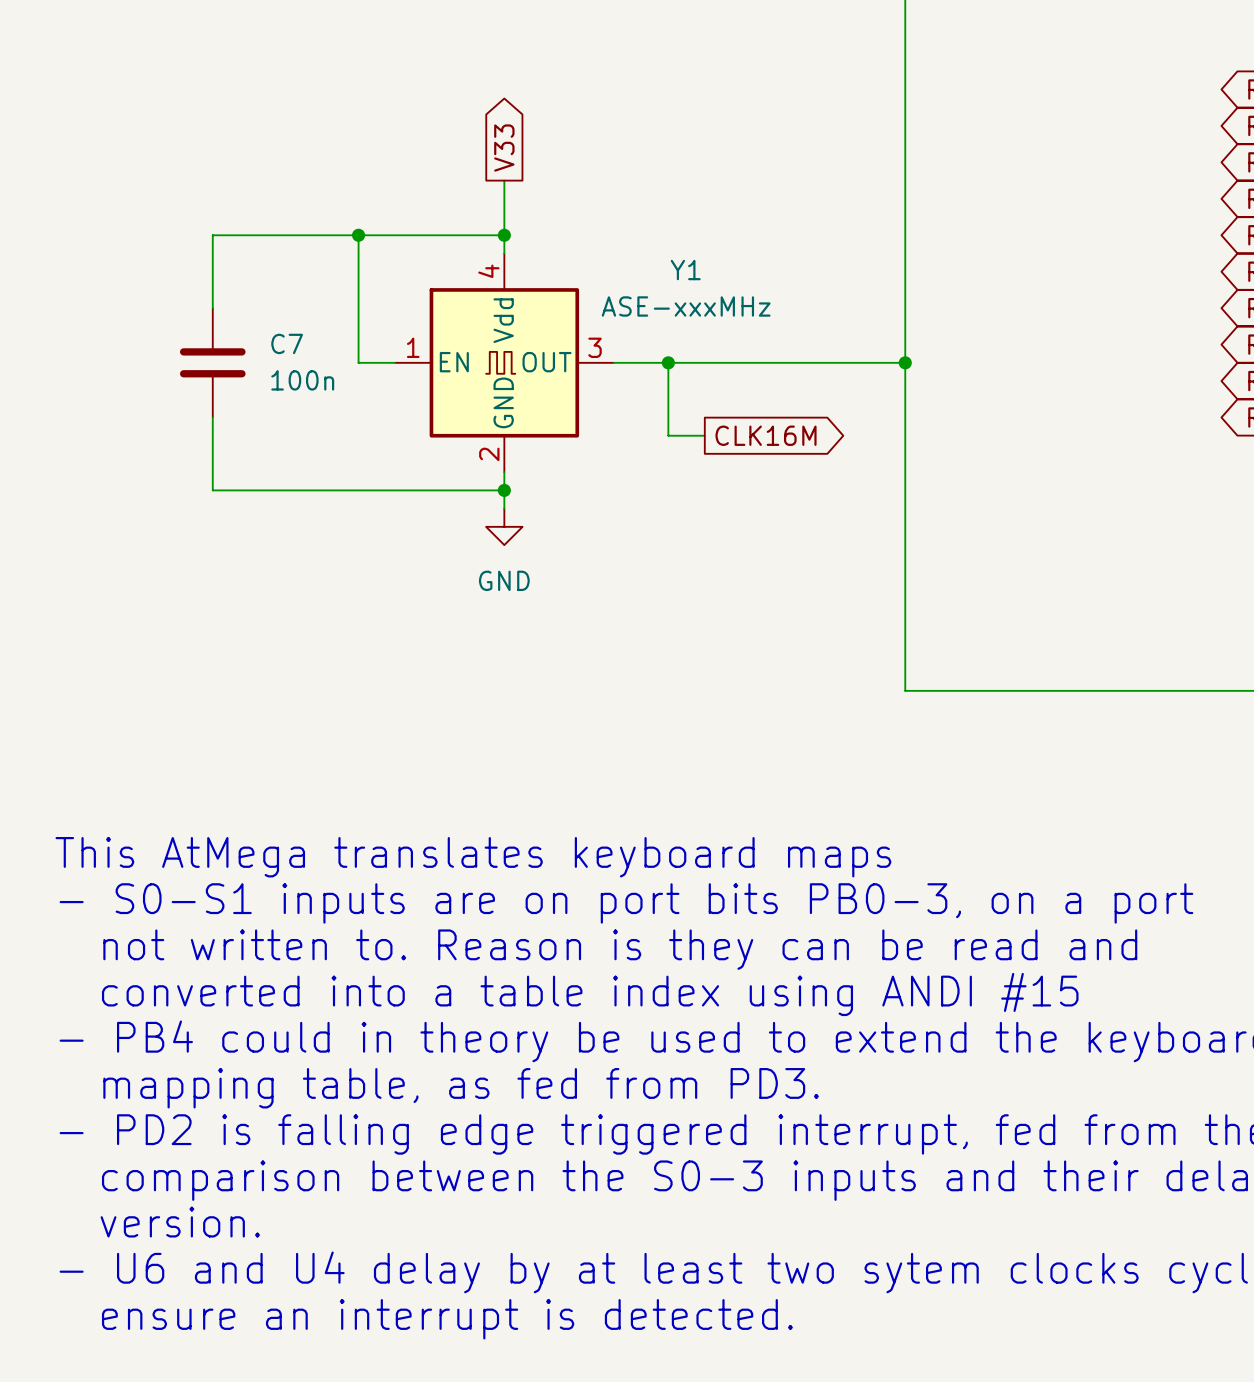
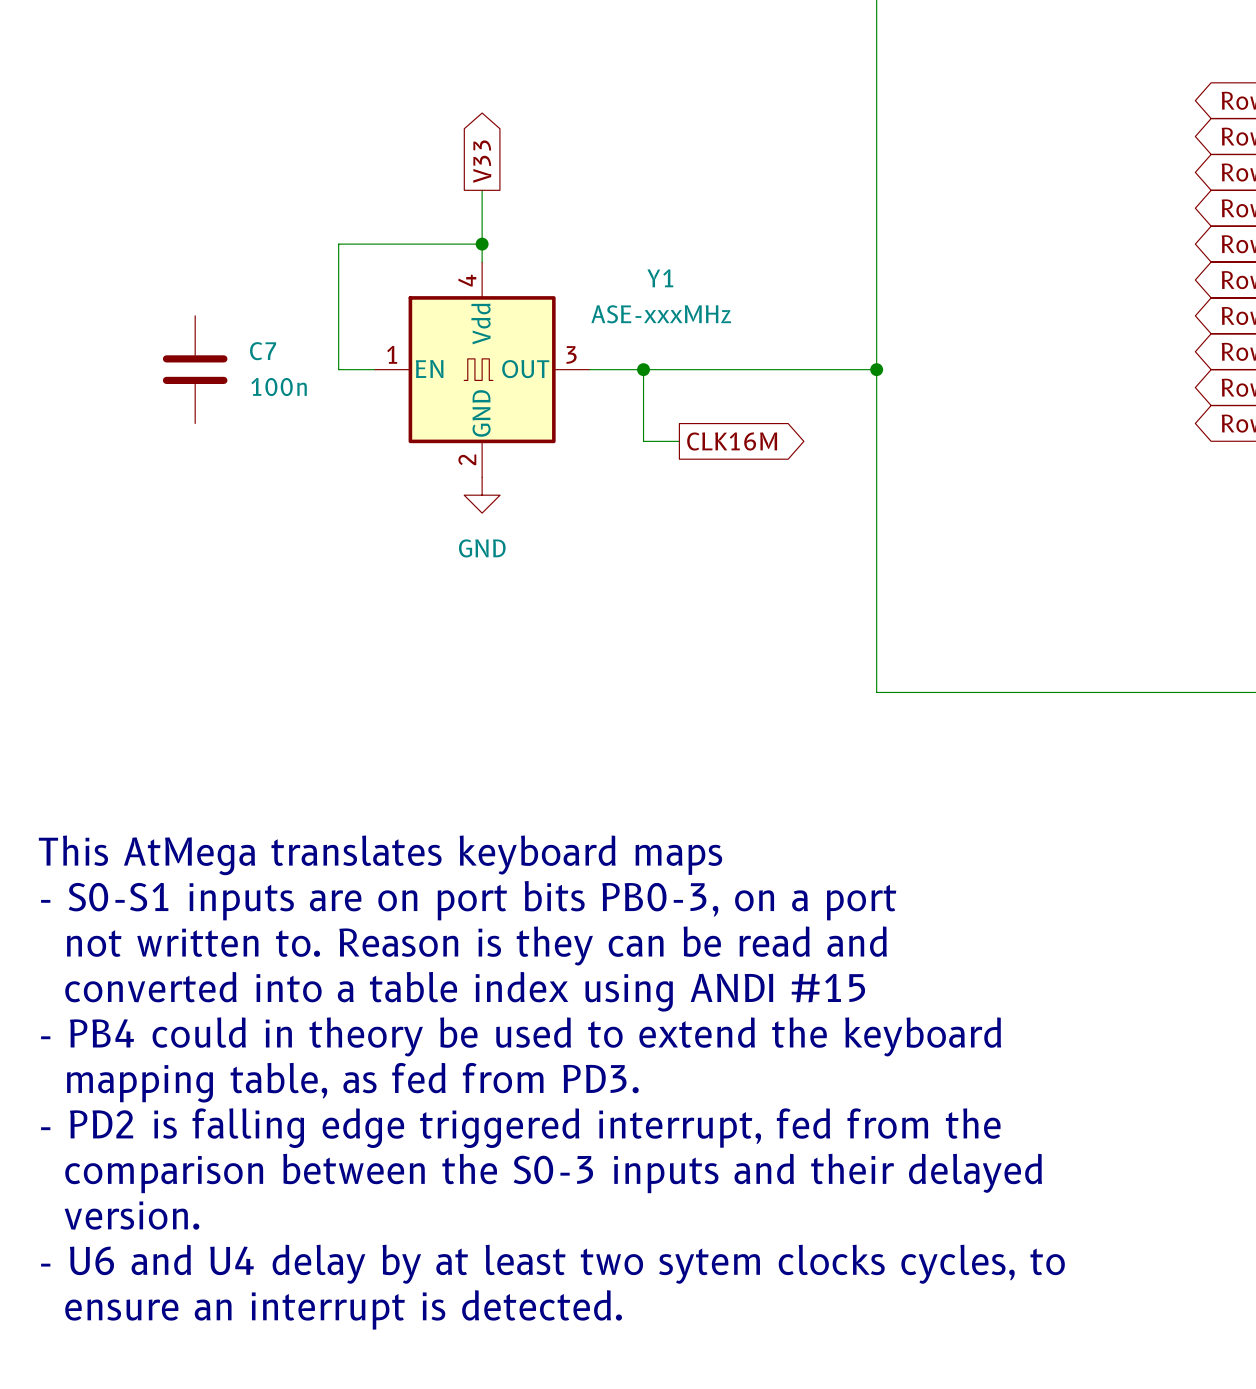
wire: (358, 235) (212, 235) (212, 308) -> none
junction: (358, 235) -> none
wire: (212, 417) (212, 490) (504, 490) -> none
junction: (504, 490) -> none
power symbol position: GND (504, 526) -> GND (482, 495)

